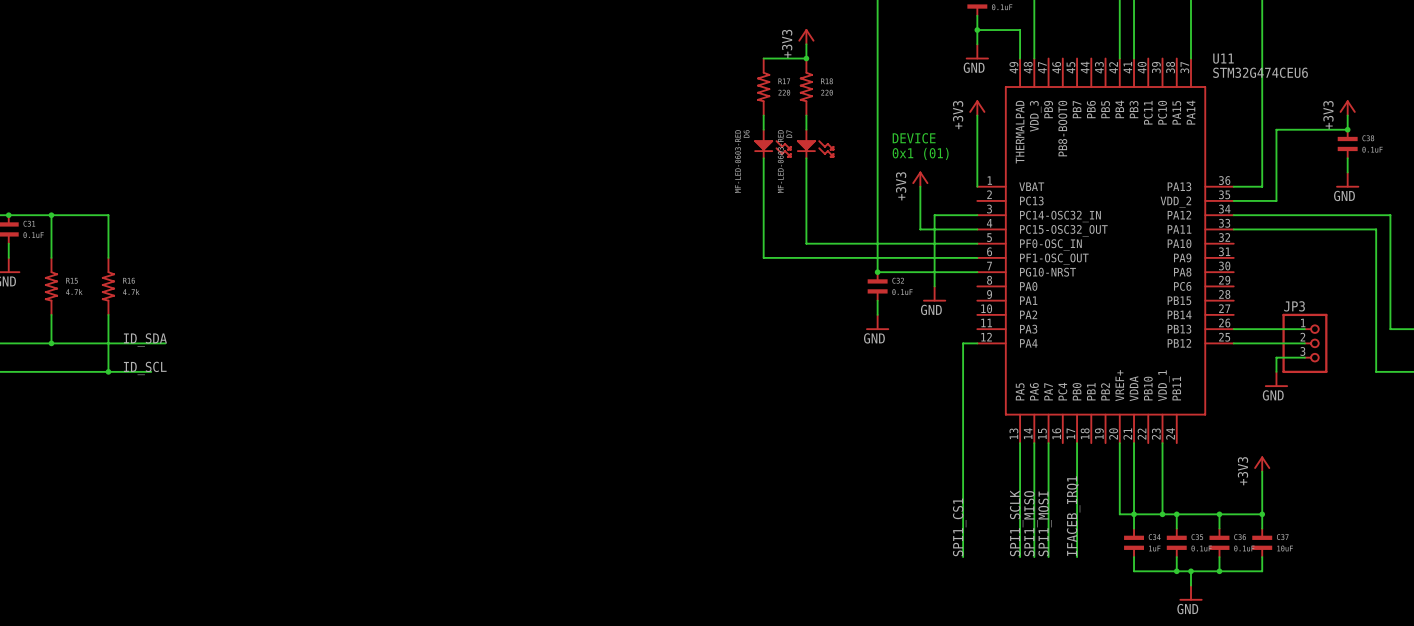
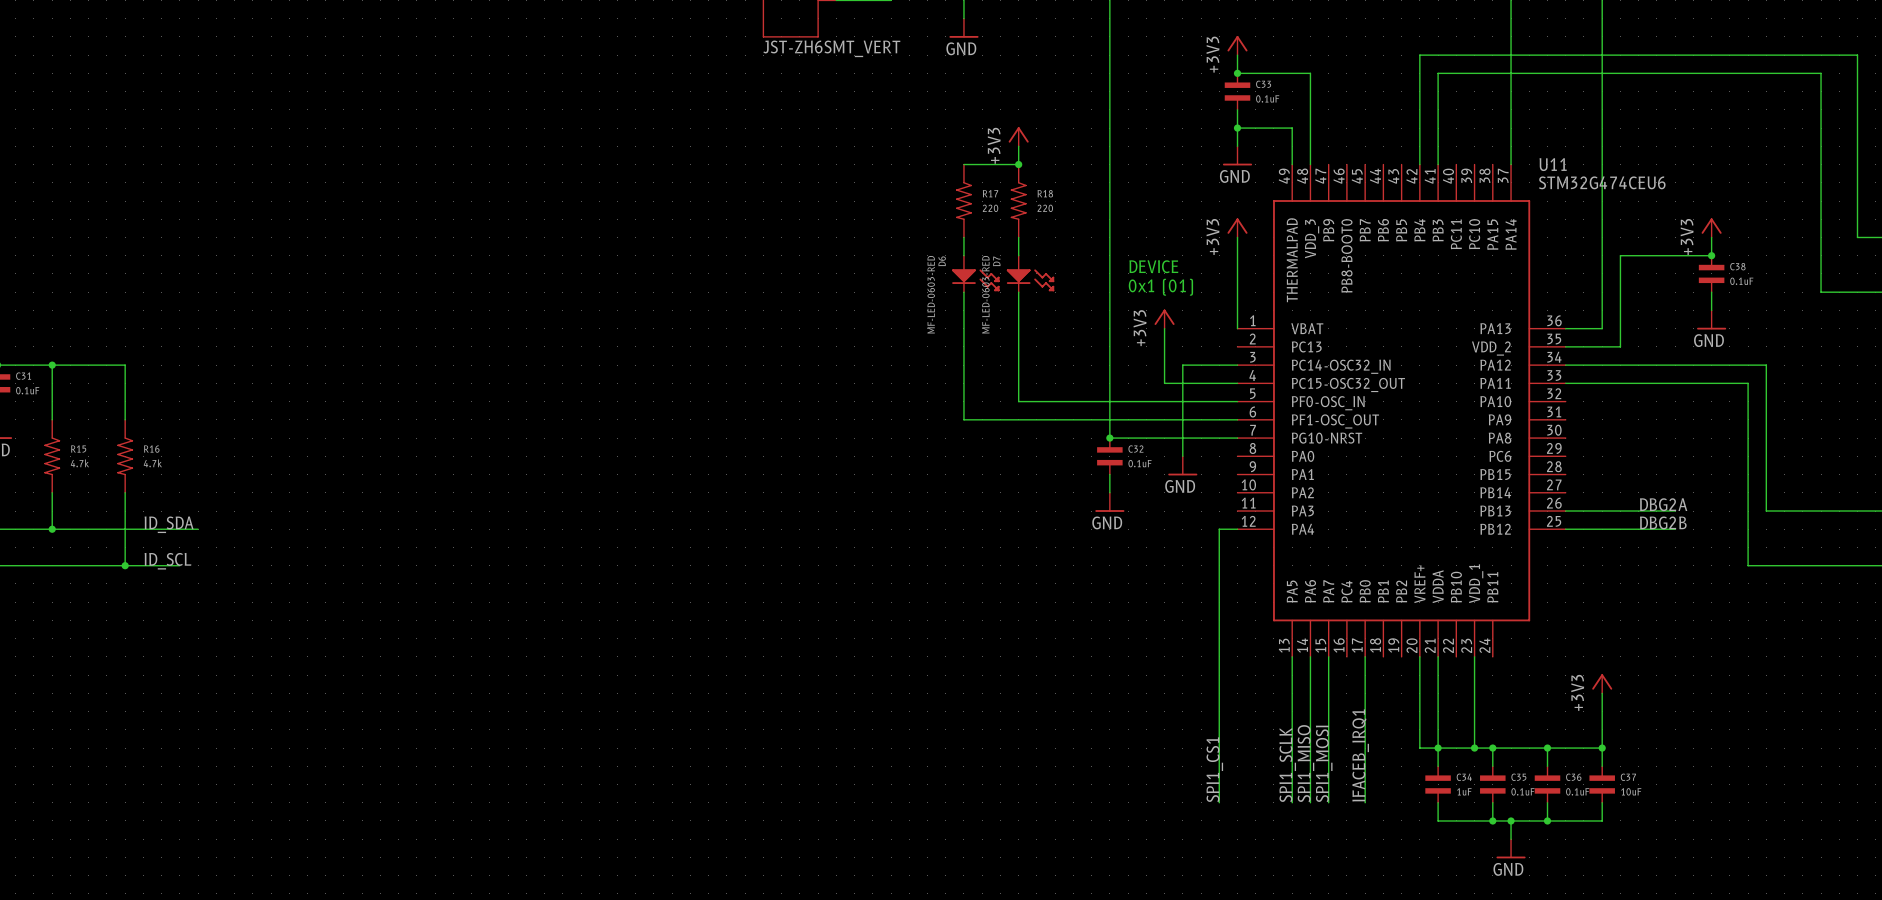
label: none -> DBG2A (1663, 504)
label: none -> DBG2B (1663, 522)
JP3: (1304, 343) -> none
wire: (1304, 357) (1276, 357) (1276, 371) -> none
power symbol: GND (1276, 379) -> none

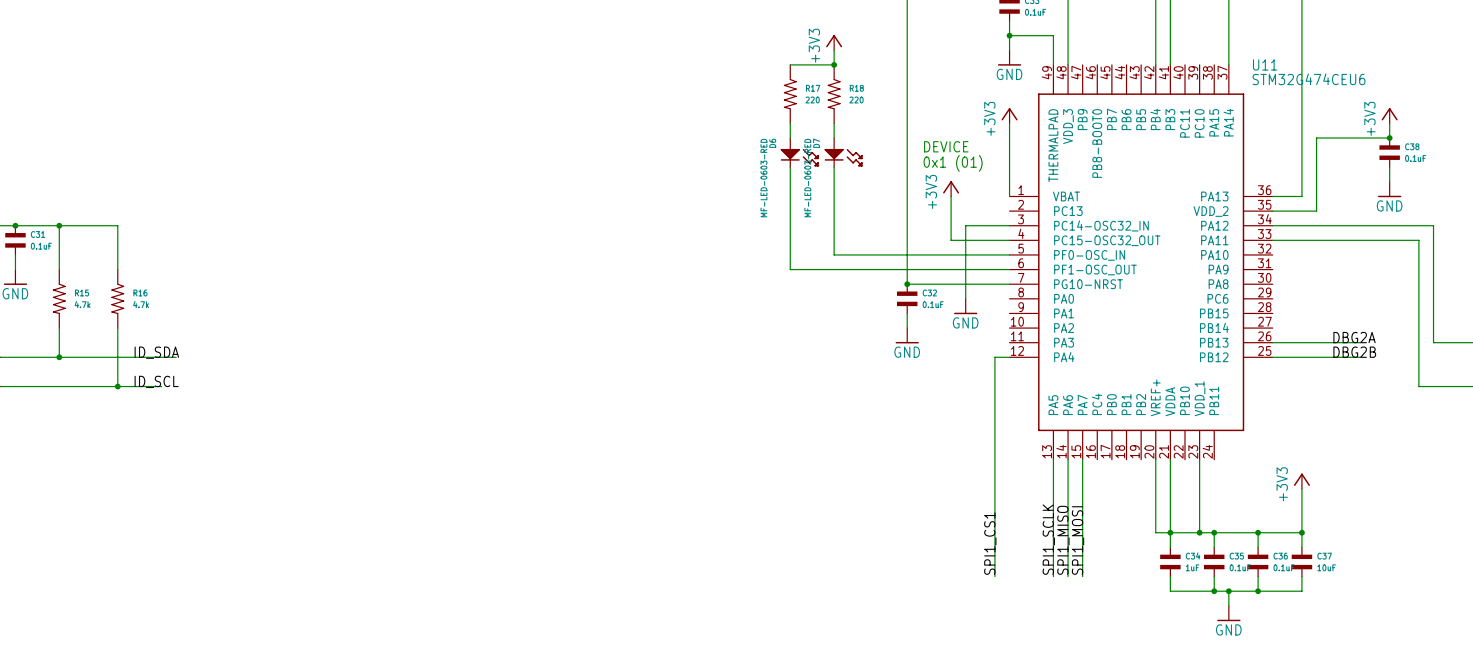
wire: (1365, 656) (1365, 802) -> none
label: IFACEB_IRQ1 (1360, 755) -> none

